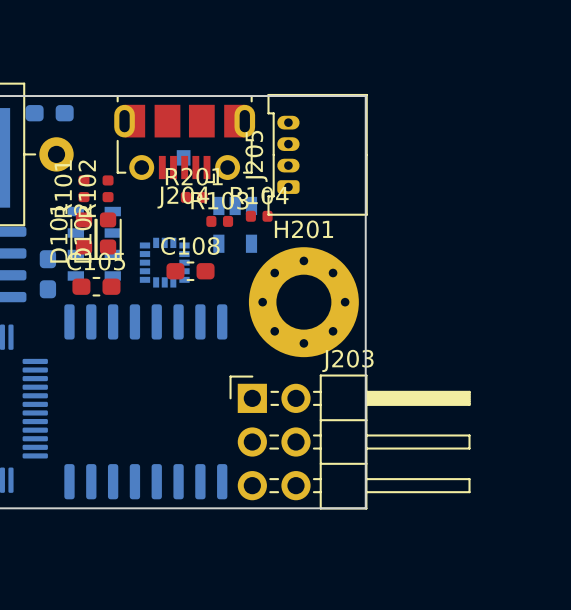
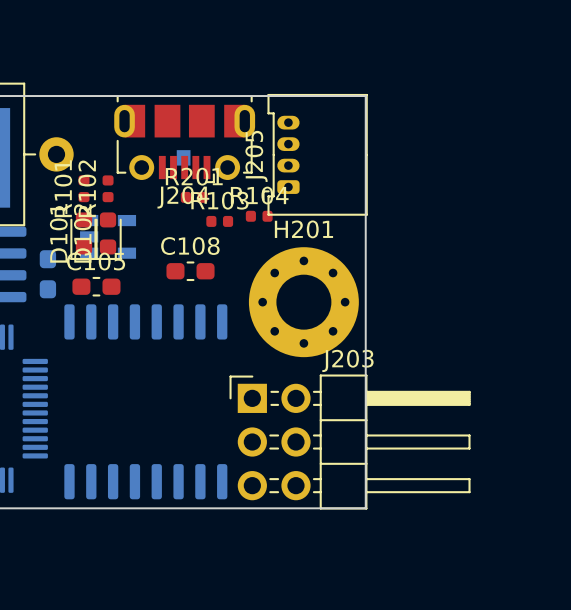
part: (49, 113) -> none
part footprint: [67, 206, 121, 281] -> [80, 214, 137, 259]
part: (235, 224) -> none
part: (164, 262) -> none

